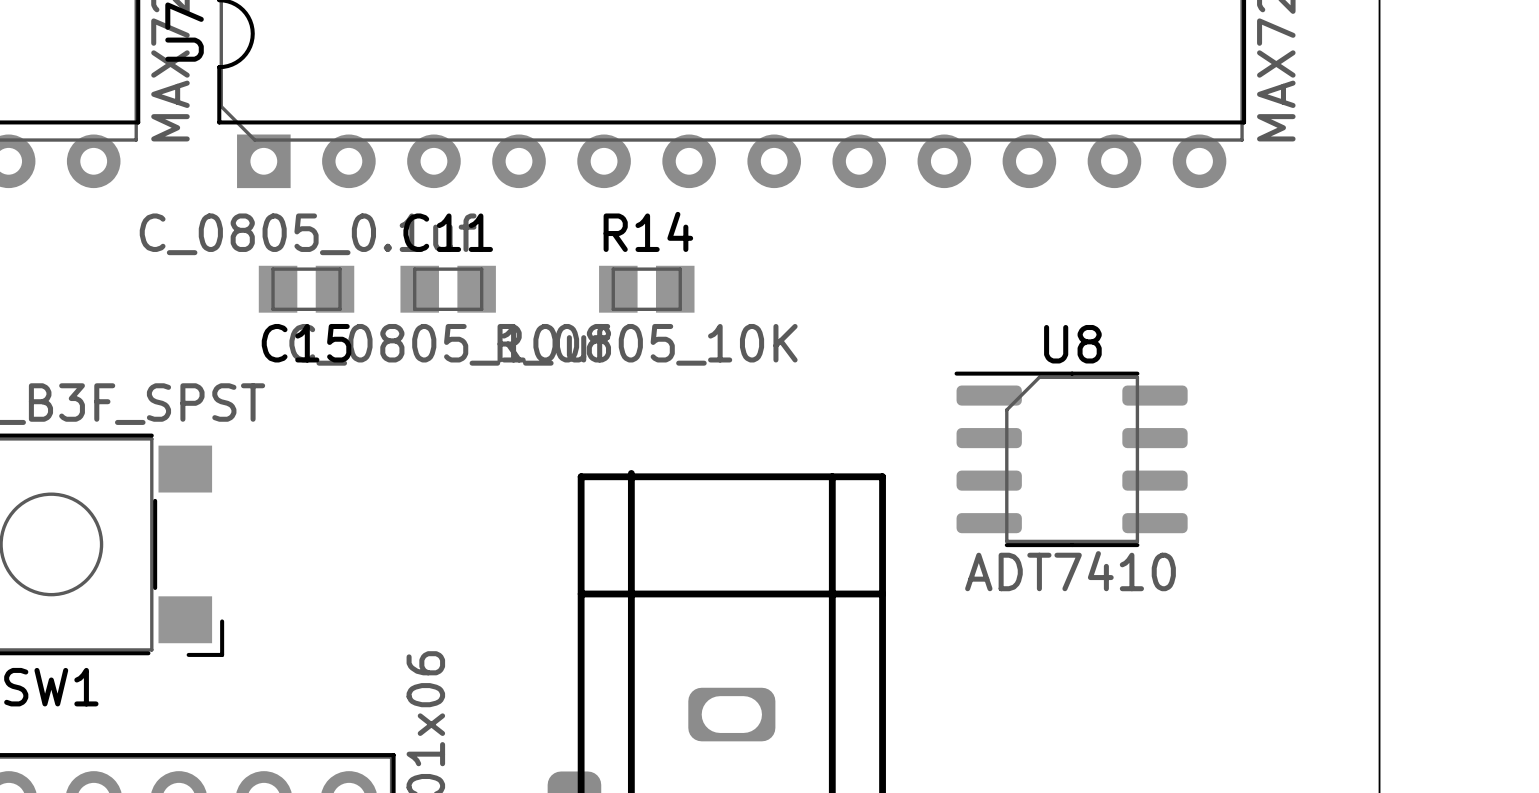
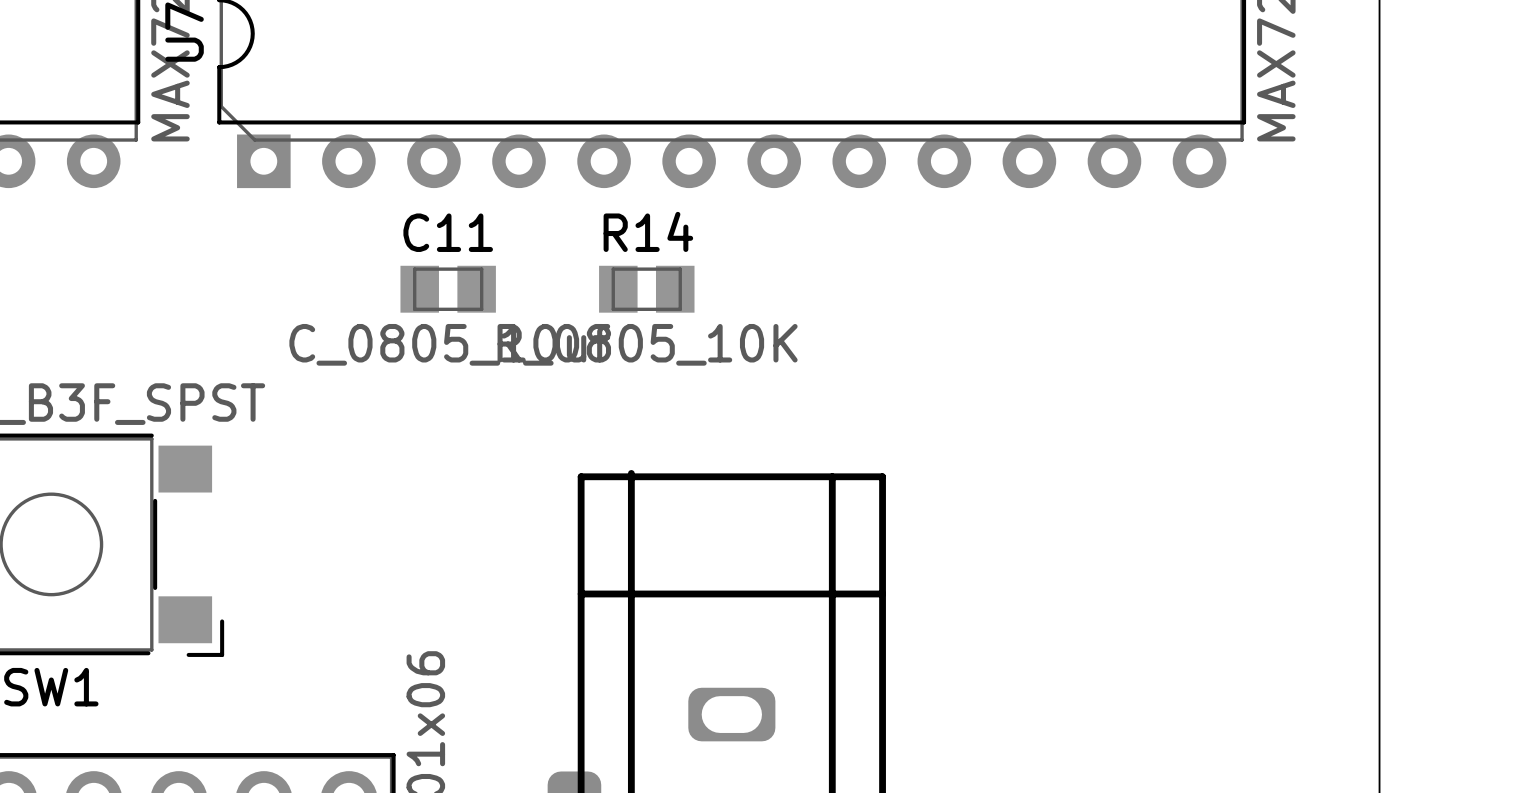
C15: C_0805_0.1uf (306, 289) -> none
U8: ADT7410 (1071, 459) -> none

